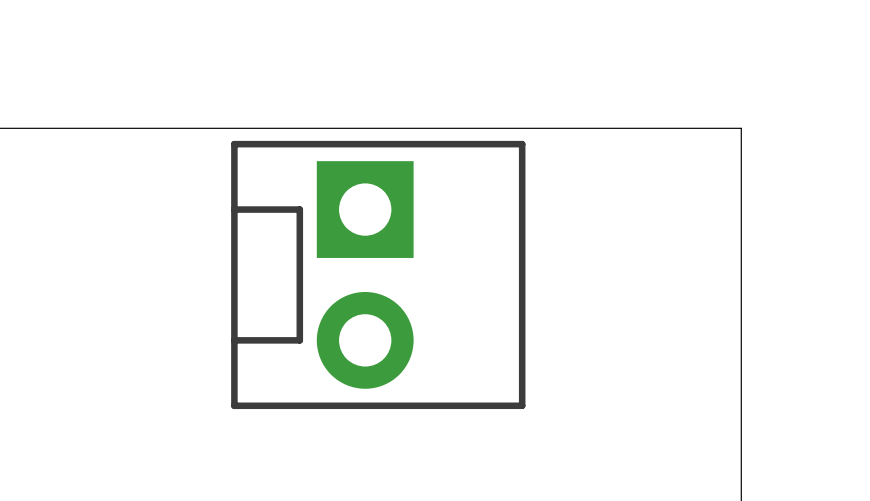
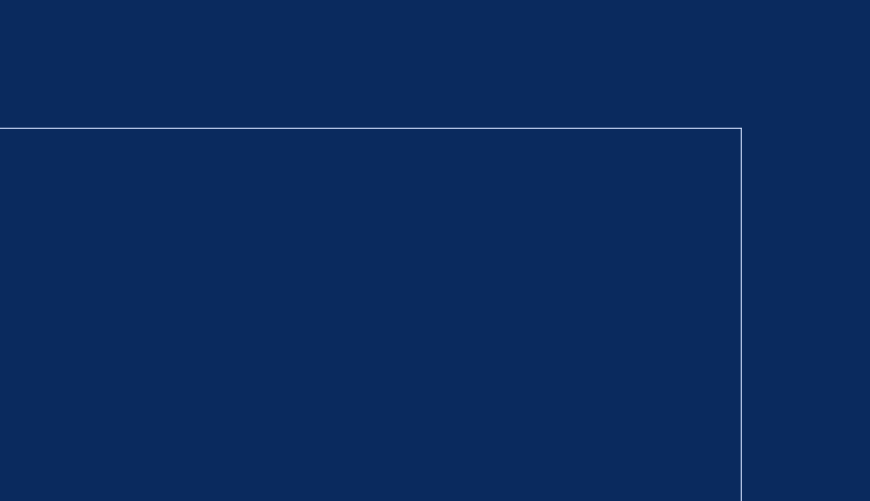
part: (378, 274) -> none

